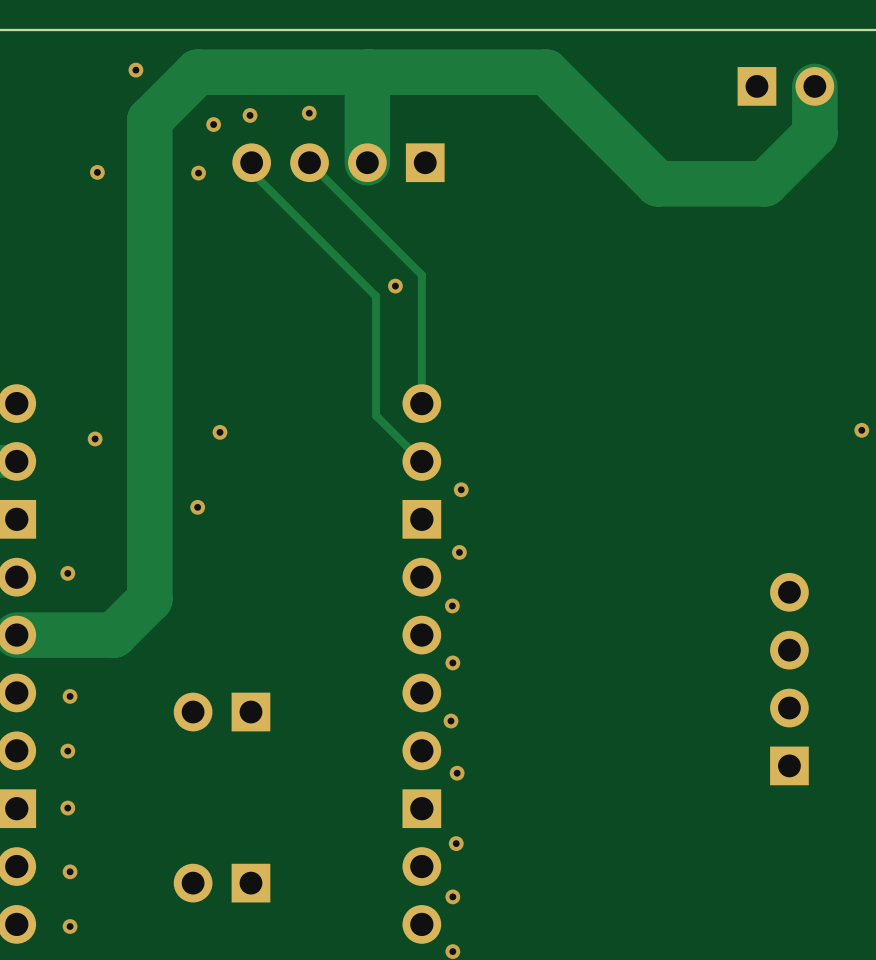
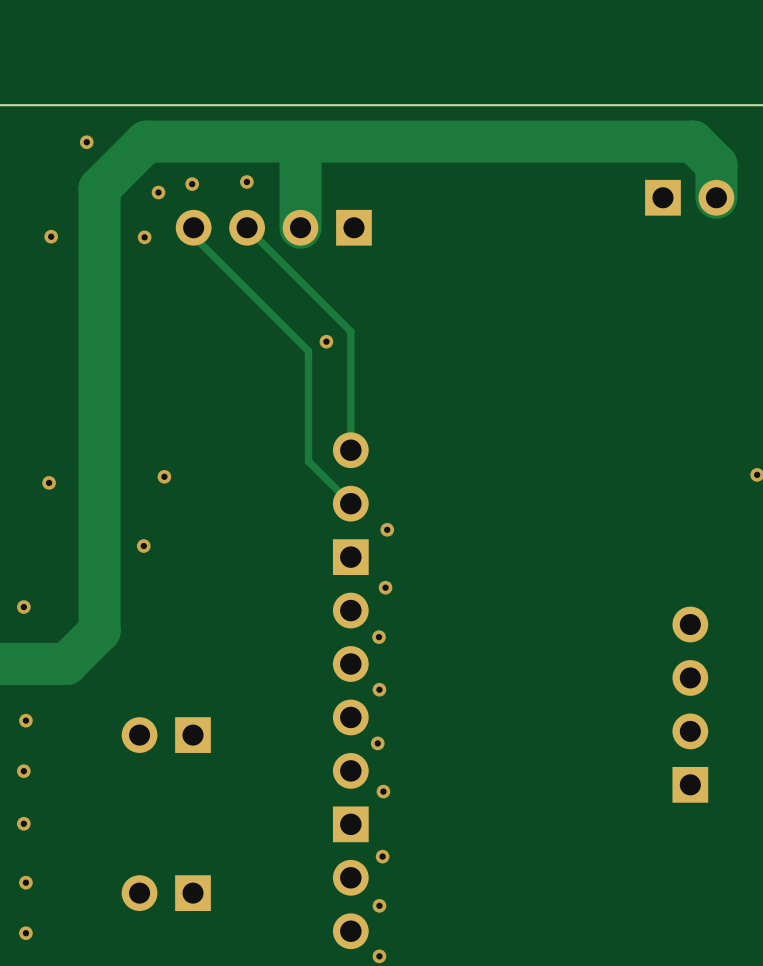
track: (197, 72) (546, 72) (657, 183) (764, 183) (814, 133) (814, 86) -> (143, 144) (146, 141) (693, 141) (716, 164) (716, 197)
part position: (785, 86) -> (689, 197)

